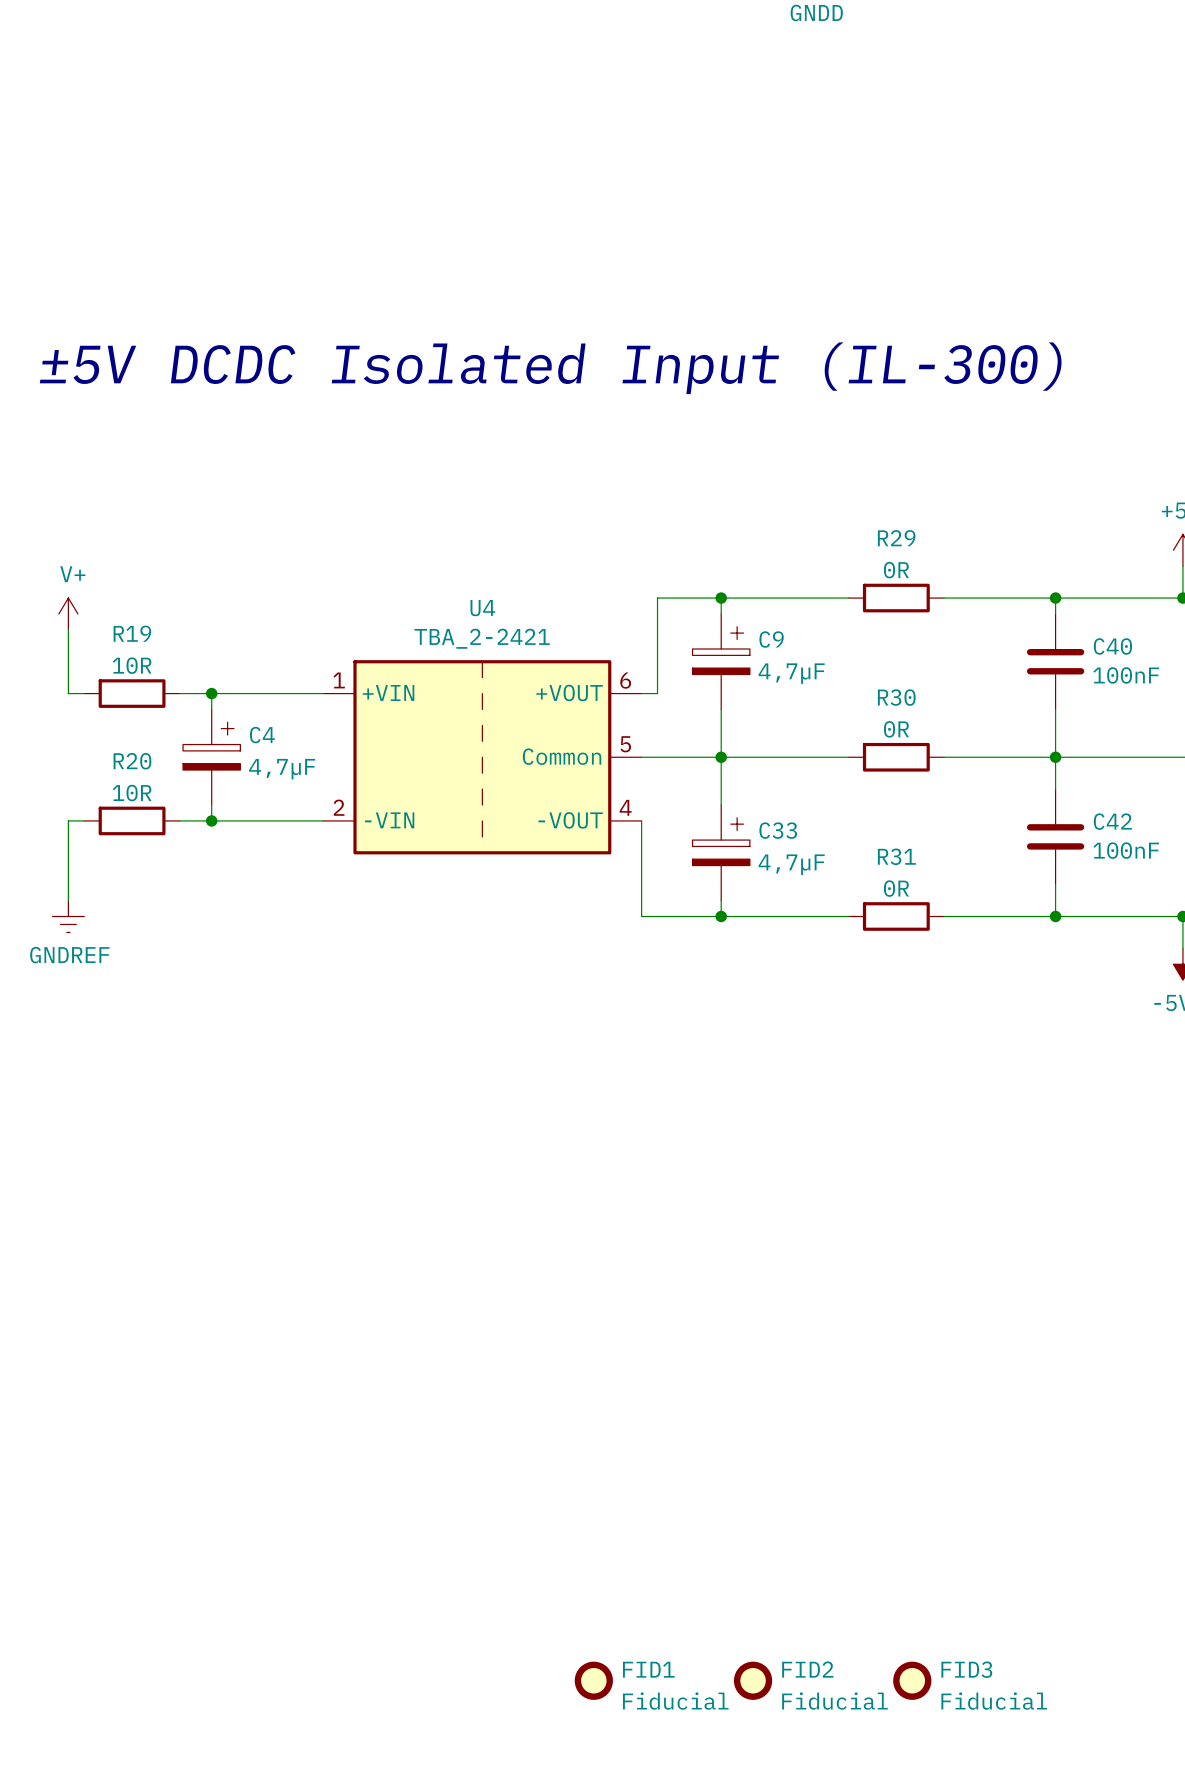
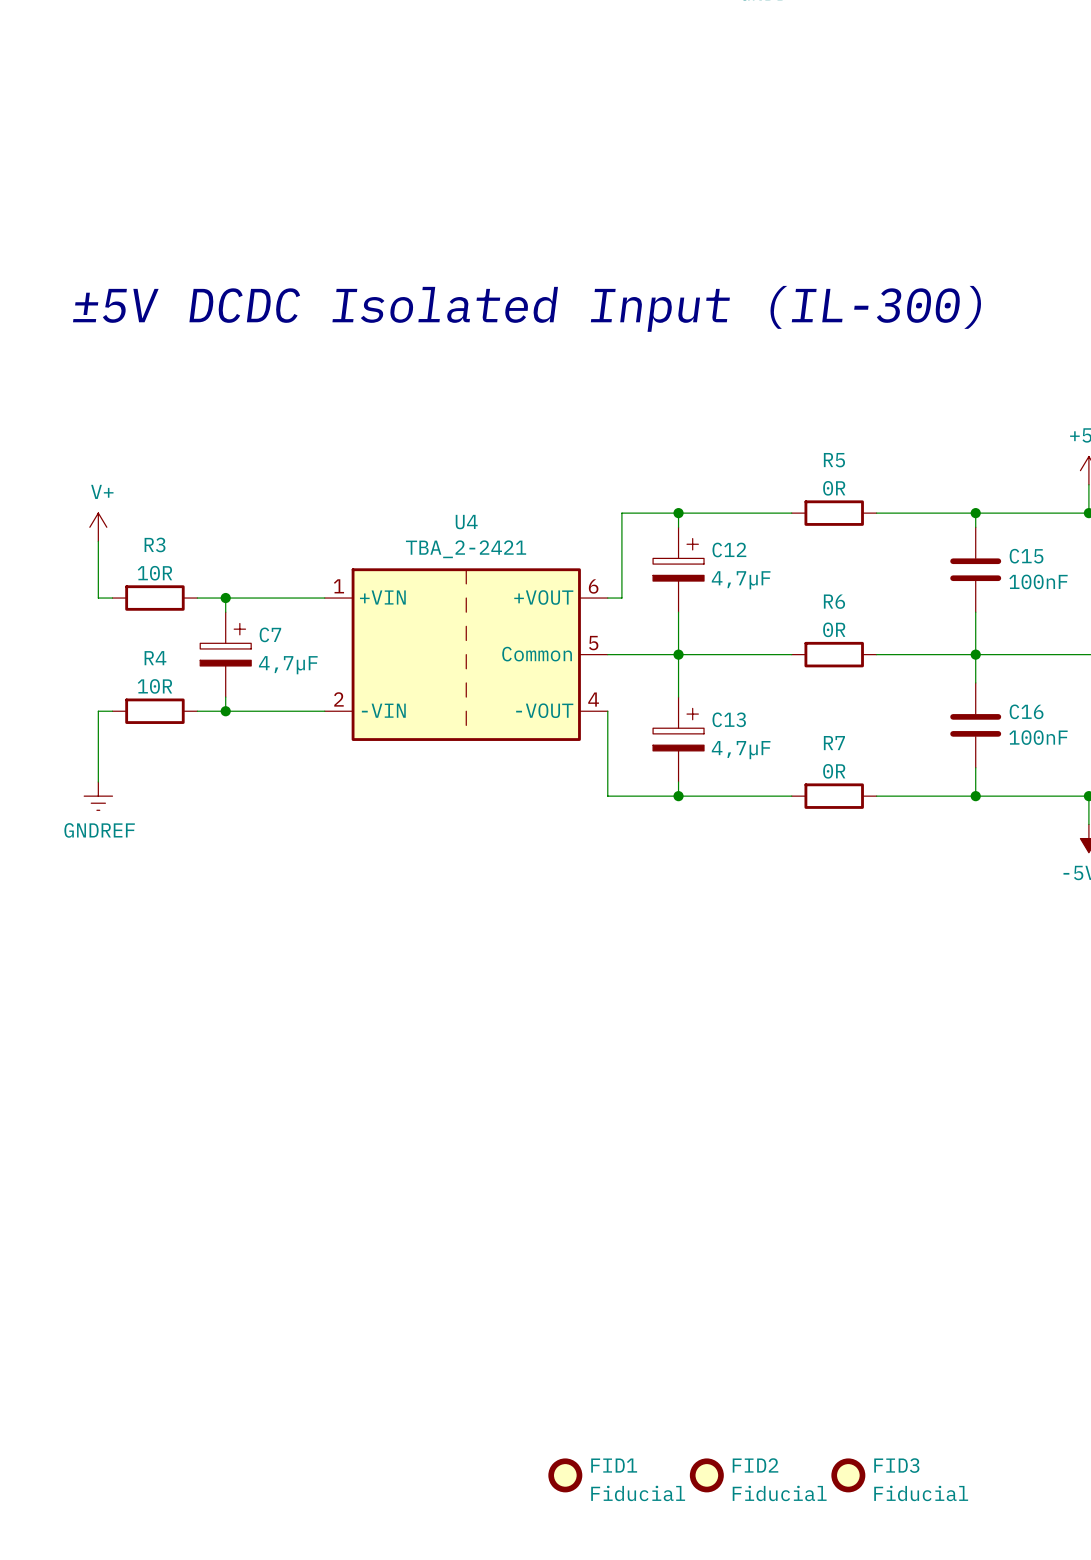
R29 name: R29 (896, 538) -> R5 (834, 460)
R19 name: R19 (132, 633) -> R3 (155, 544)
C9 name: C9 (771, 639) -> C12 (729, 549)
C40 name: C40 (1112, 646) -> C15 (1026, 556)
R30 name: R30 (896, 697) -> R6 (834, 601)
C4 name: C4 (262, 735) -> C7 (270, 634)
R20 name: R20 (132, 761) -> R4 (155, 658)
C42 name: C42 (1112, 821) -> C16 (1026, 711)
C33 name: C33 (778, 830) -> C13 (729, 719)
R31 name: R31 (896, 856) -> R7 (834, 743)

